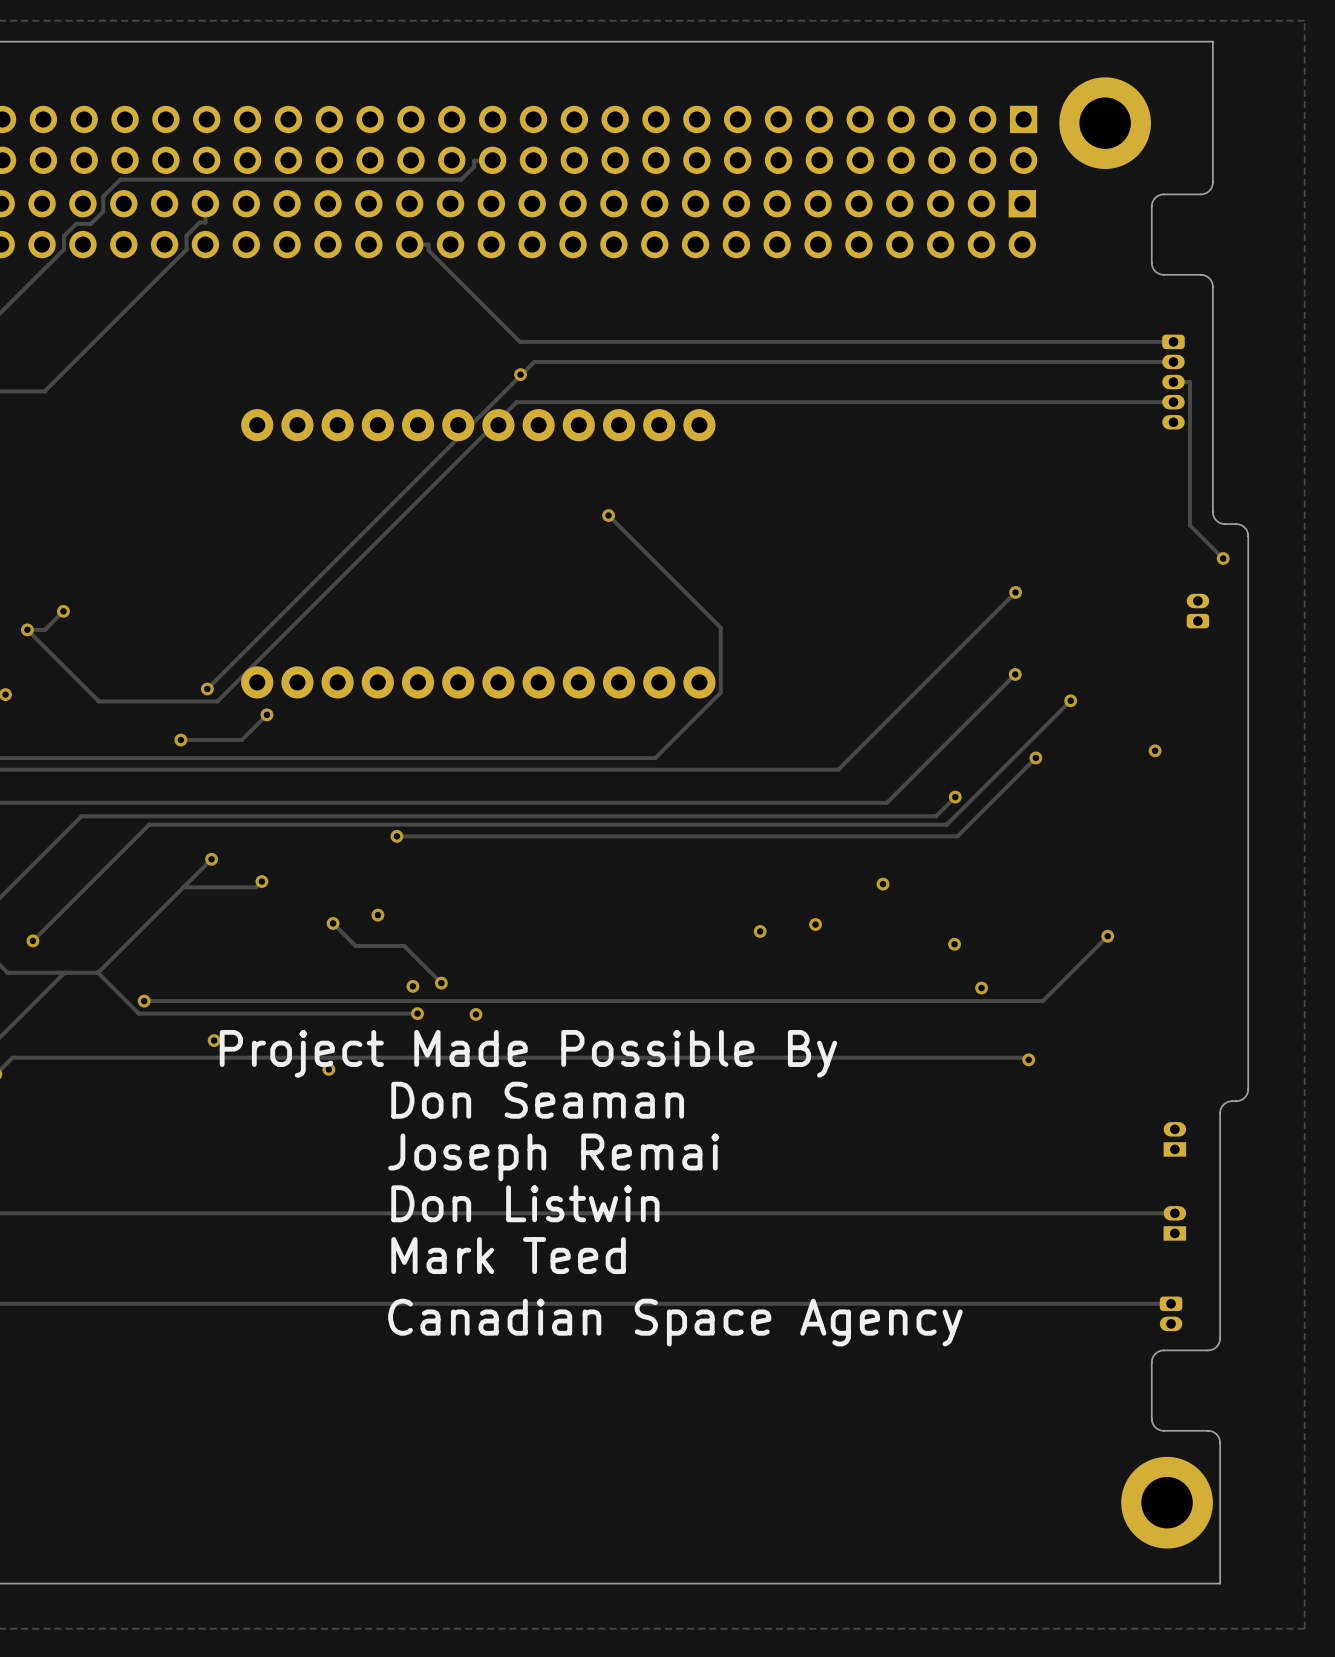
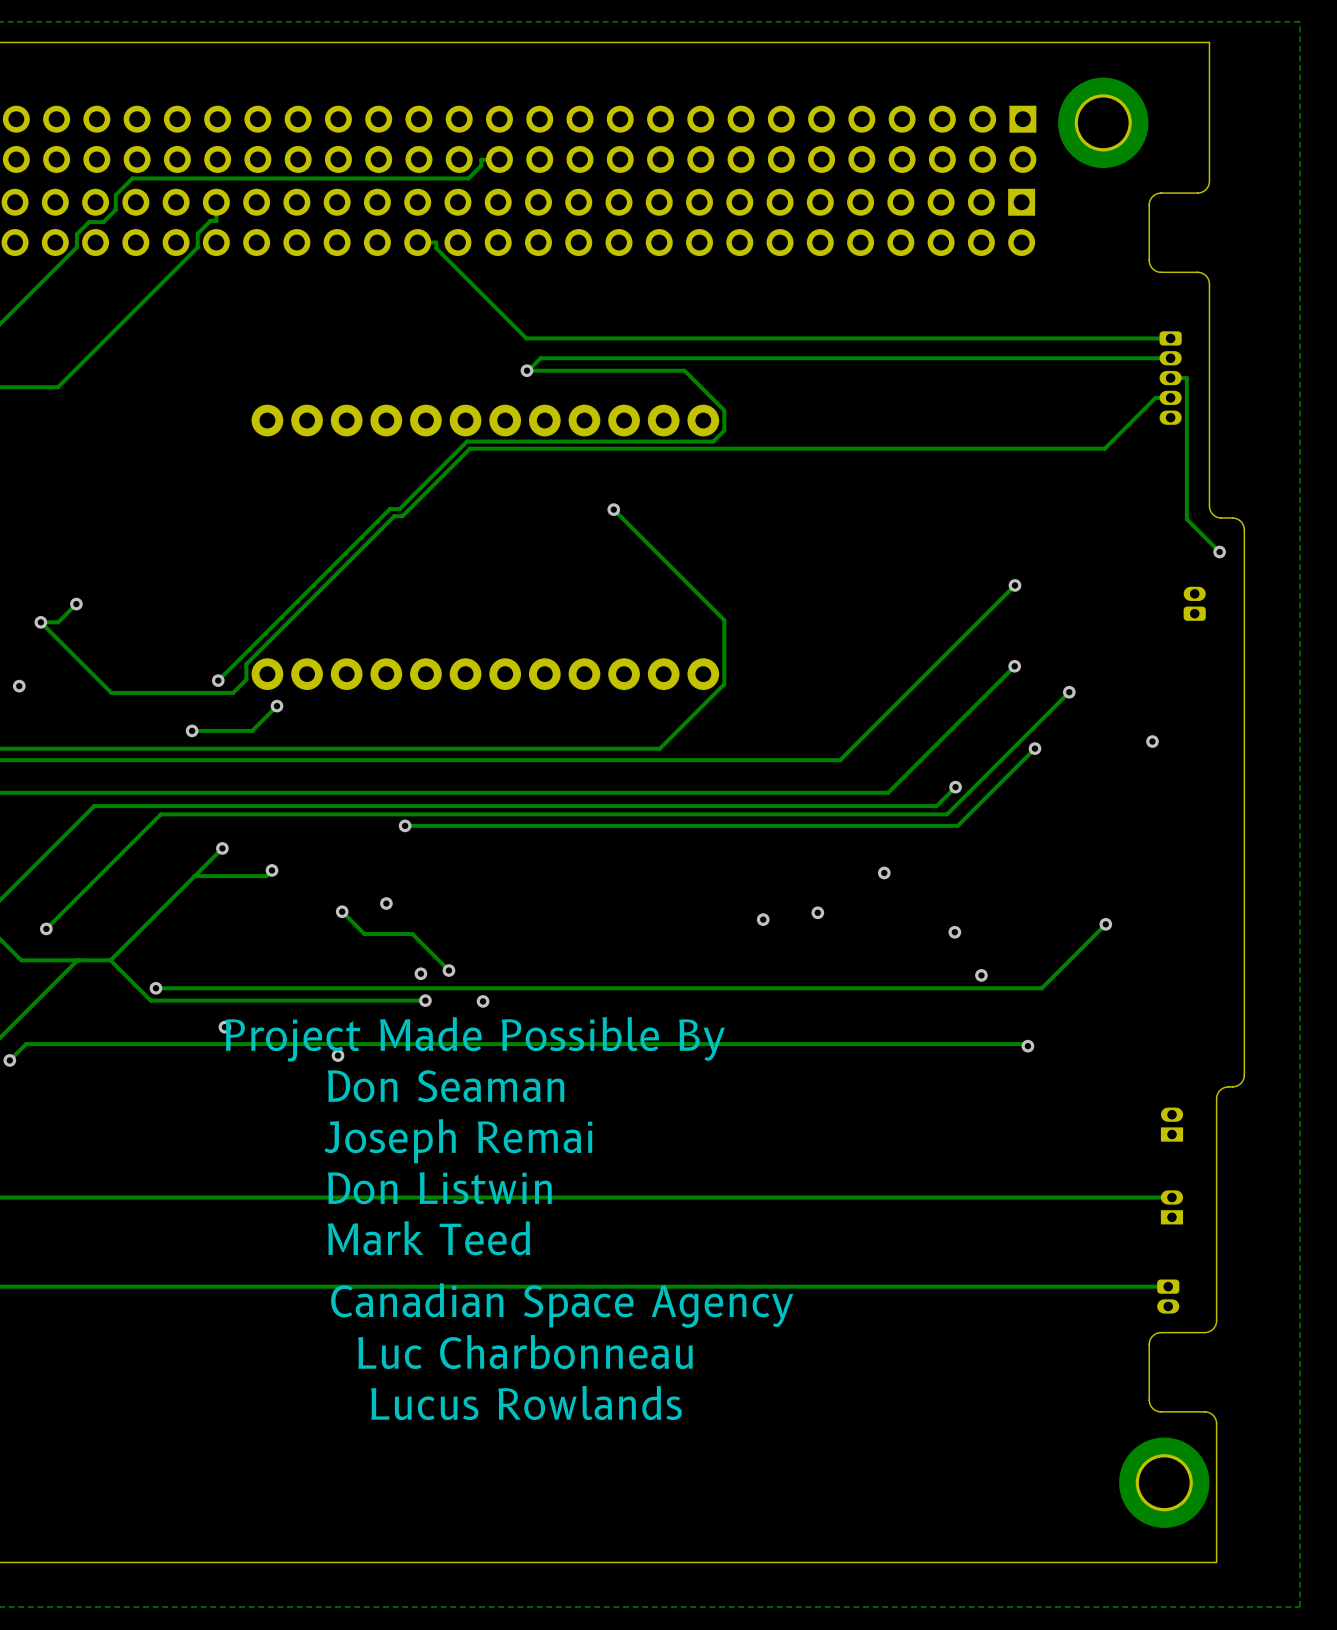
track: (520, 375) (381, 514) -> (526, 370) (684, 370) (724, 410) (724, 430) (713, 441) (467, 441) (399, 509) (389, 509)
track: (1158, 402) (516, 402) (217, 701) -> (1155, 397) (1104, 448) (470, 448) (402, 516) (394, 516) (246, 664) (246, 679) (233, 692) (228, 692)
text position: Canadian Space Agency (675, 1322) -> Canadian Space Agency (562, 1305)
text: none -> Luc Charbonneau (525, 1351)
text: none -> Lucus Rowlands (526, 1403)

